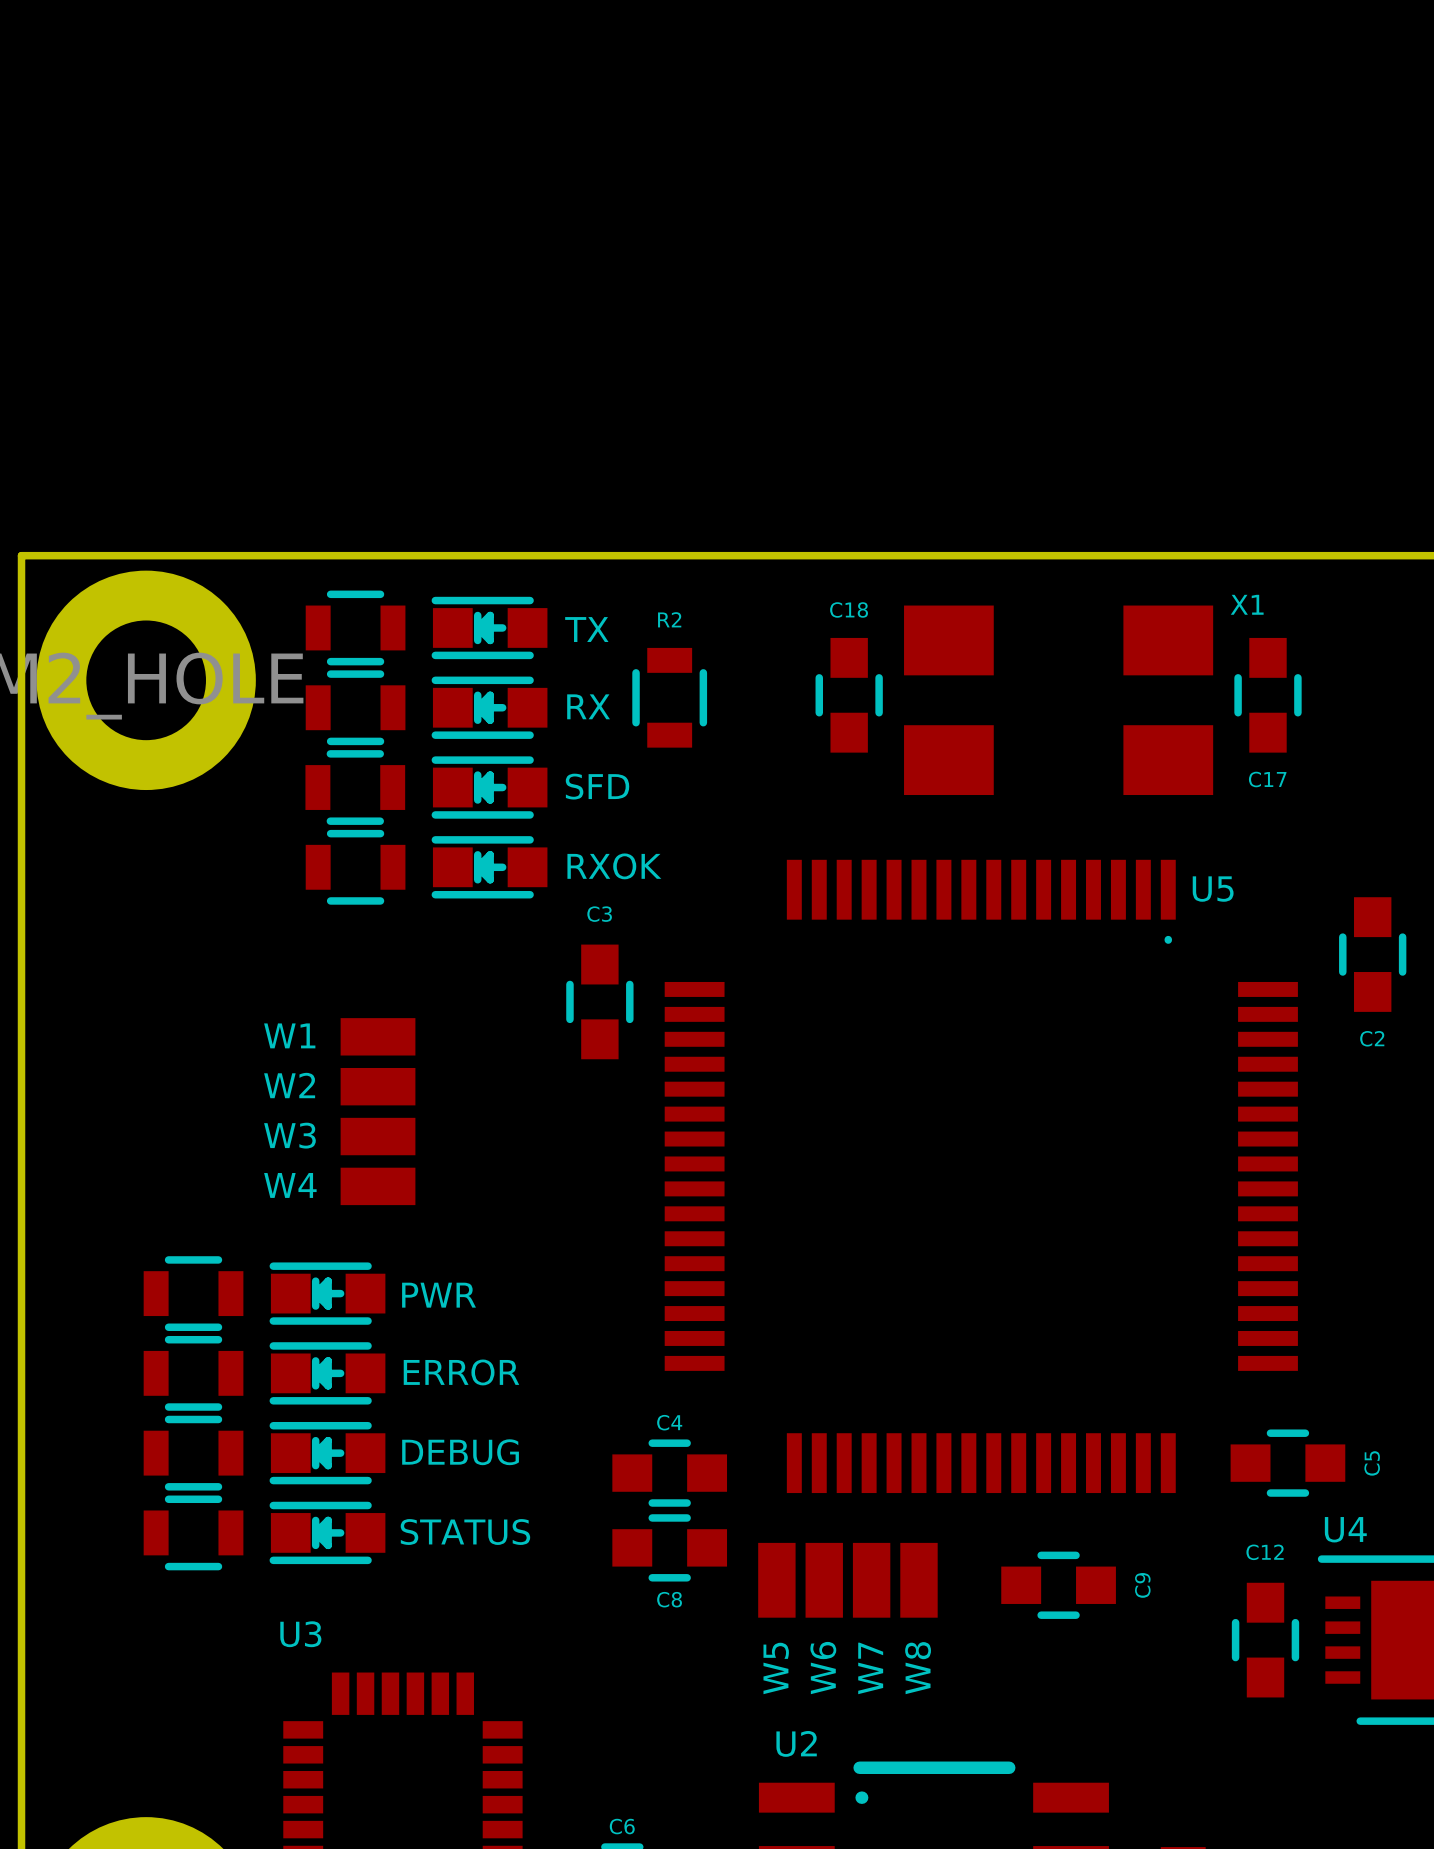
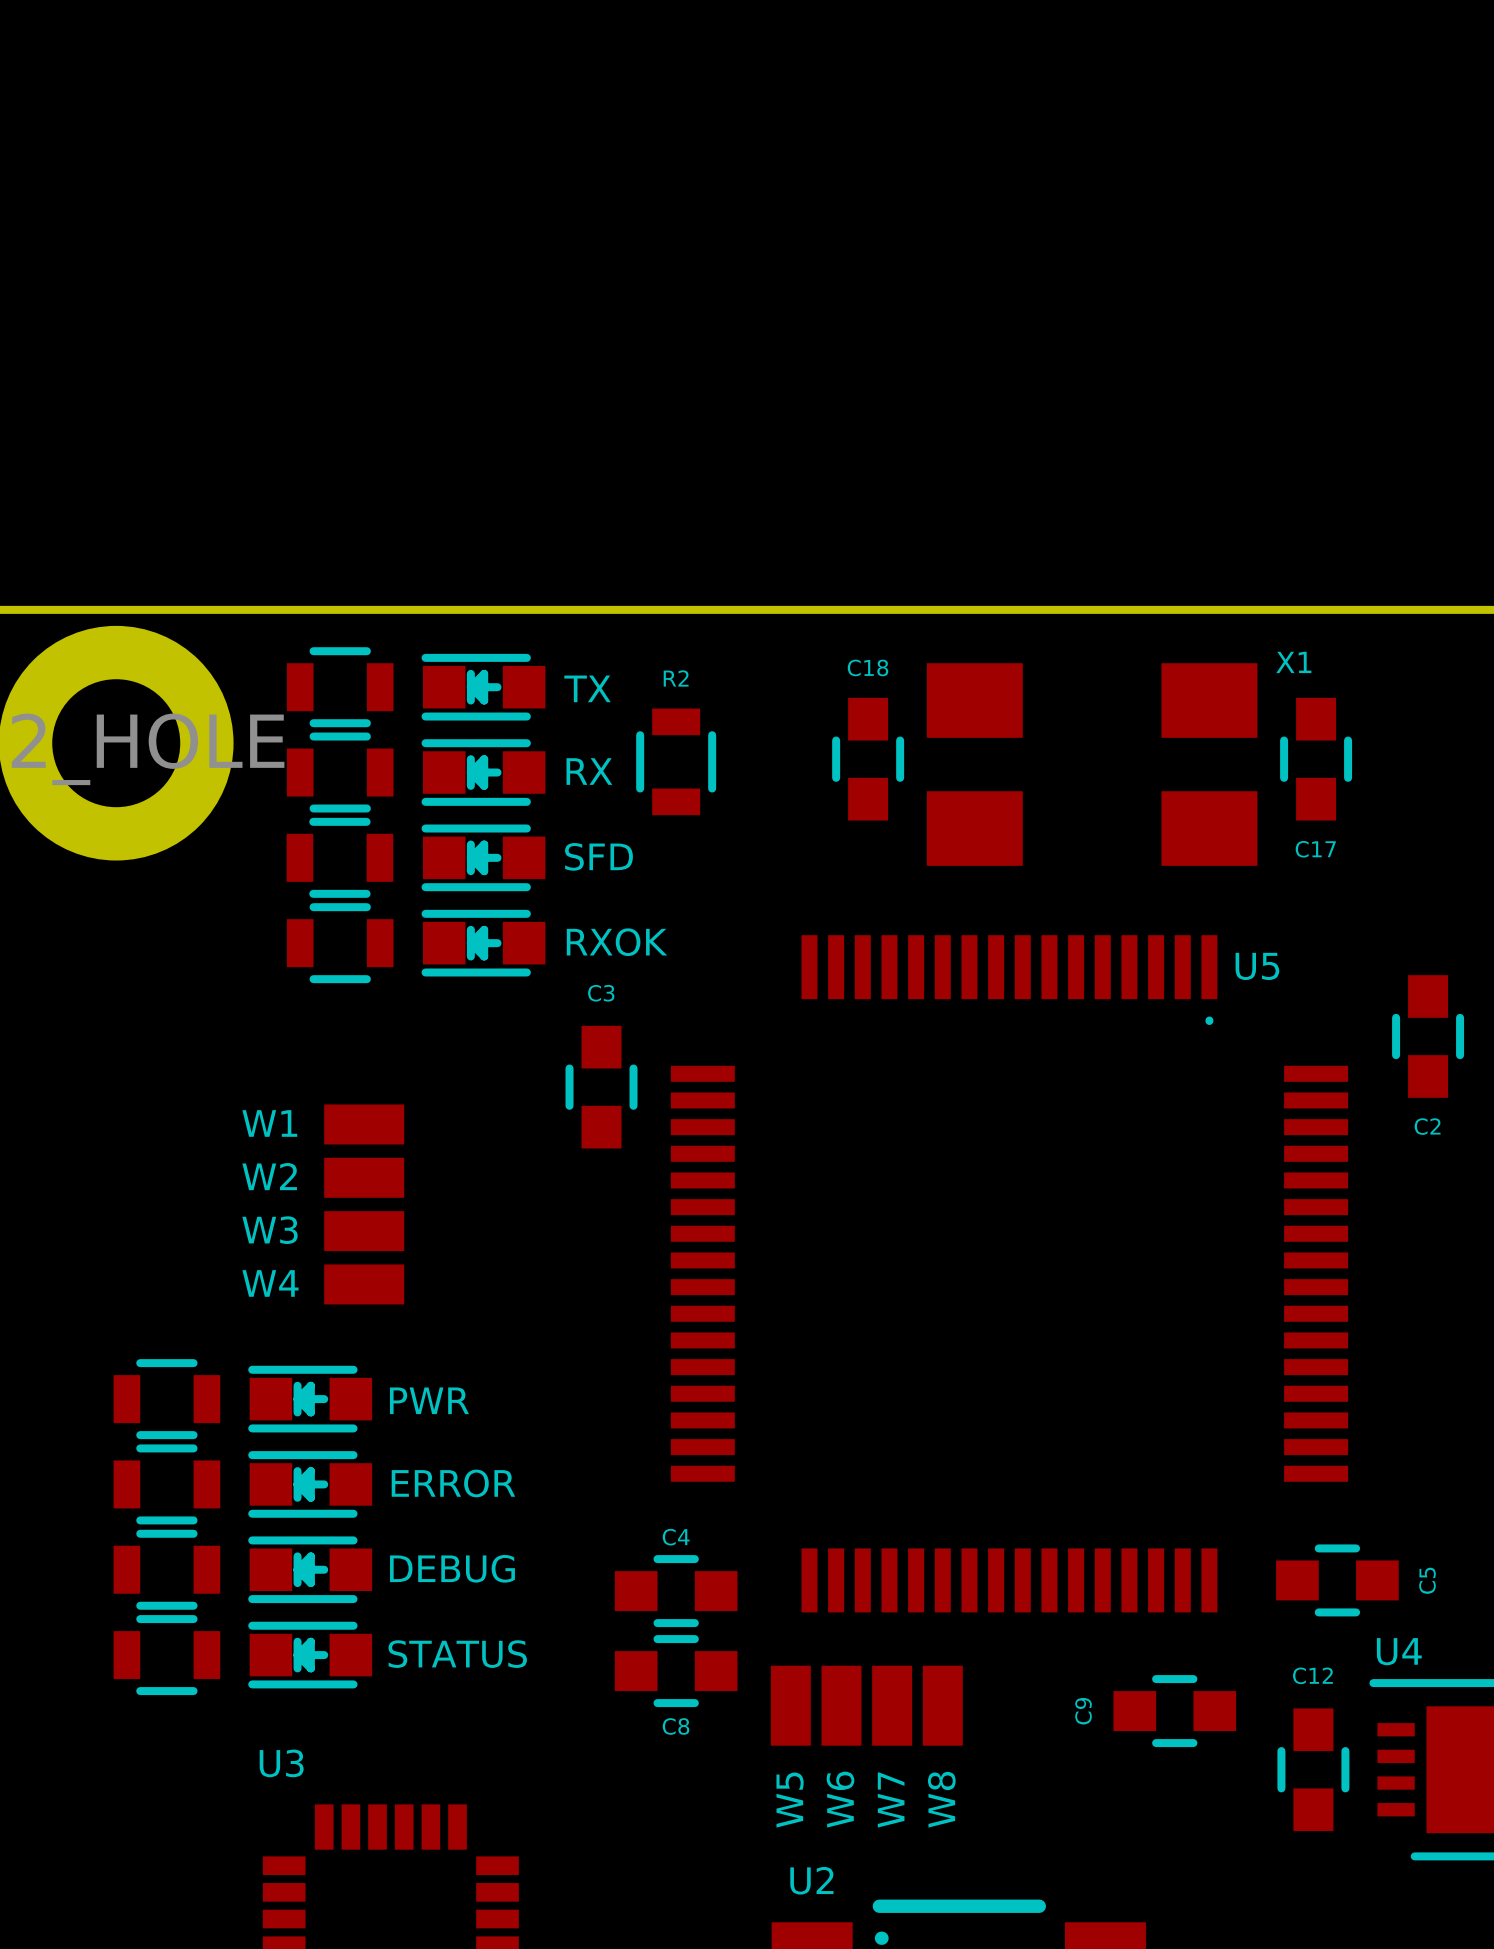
C9 position: (1058, 1585) -> (1174, 1711)
C9 name position: C9 (1142, 1585) -> C9 (1083, 1711)

